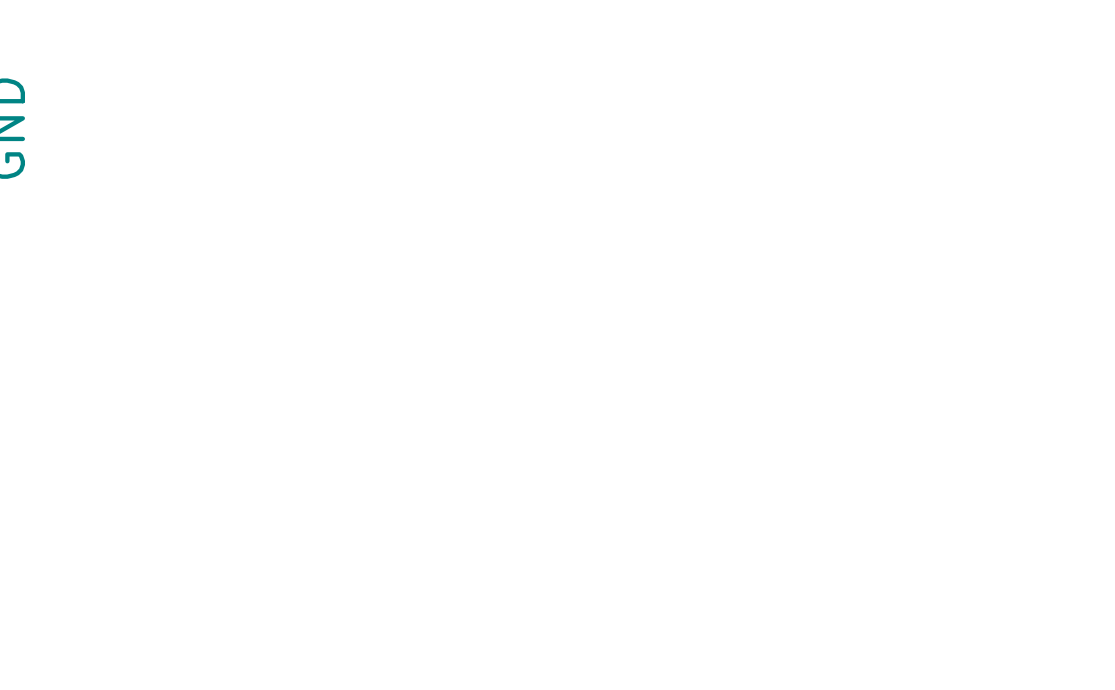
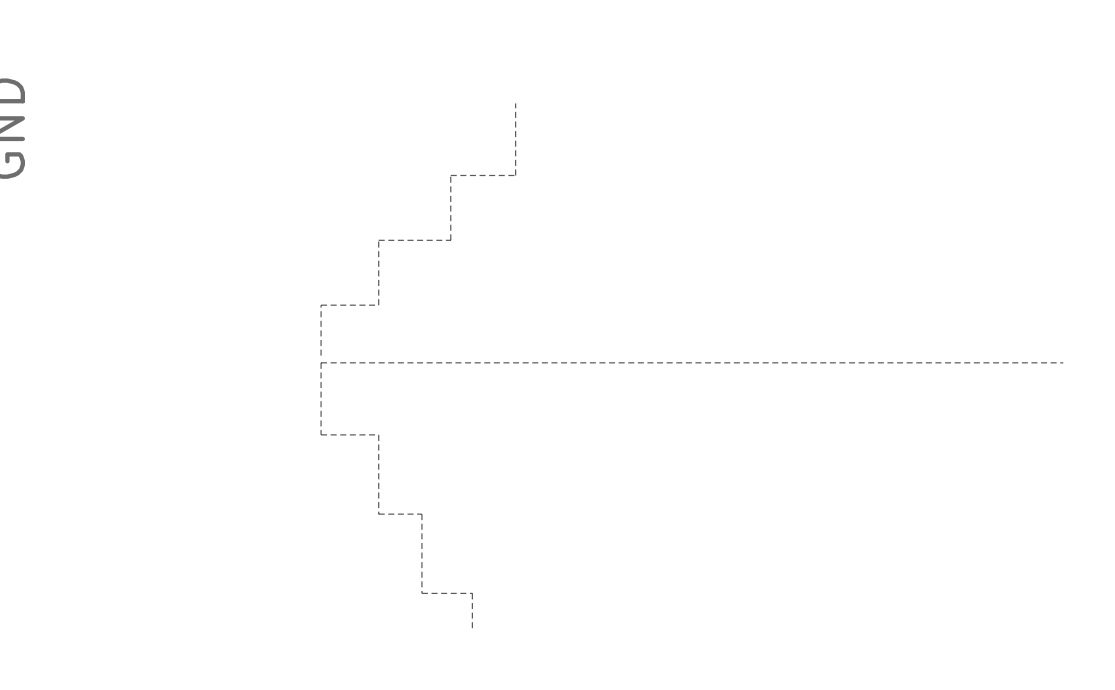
line: none -> (515, 103) (515, 175) (450, 175) (450, 240) (378, 240) (378, 305) (321, 305) (321, 355)
line: none -> (1063, 362) (321, 362) (321, 434) (378, 434) (378, 514) (421, 514) (421, 593) (472, 593) (472, 629)

